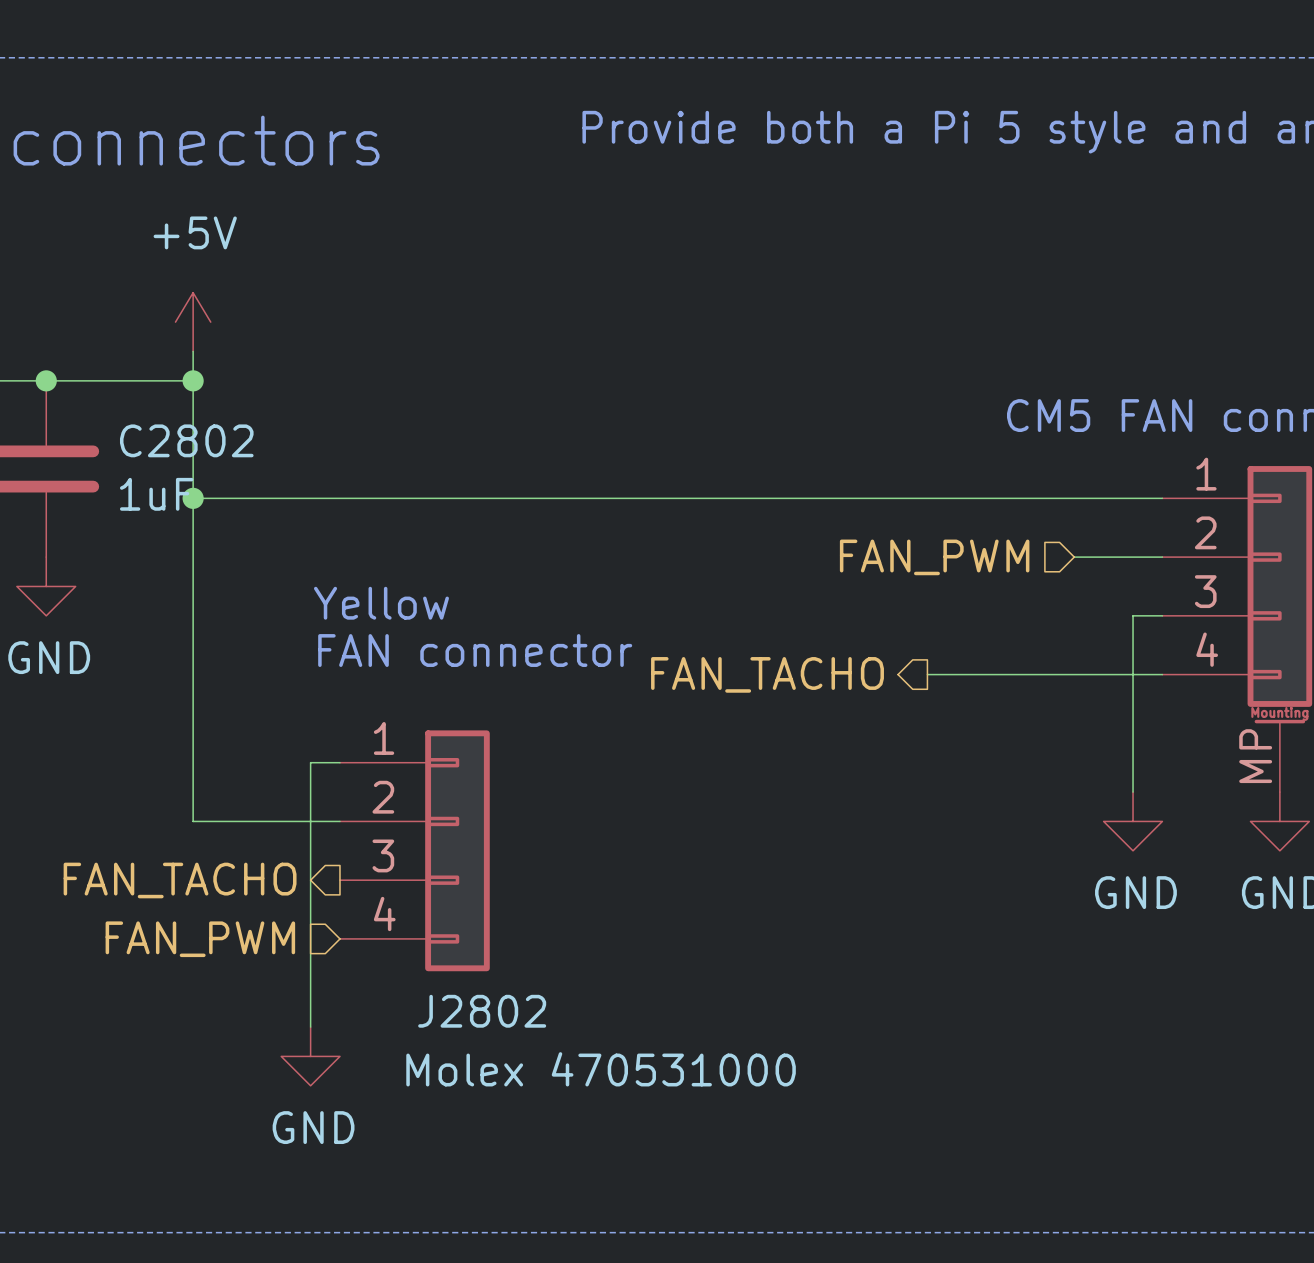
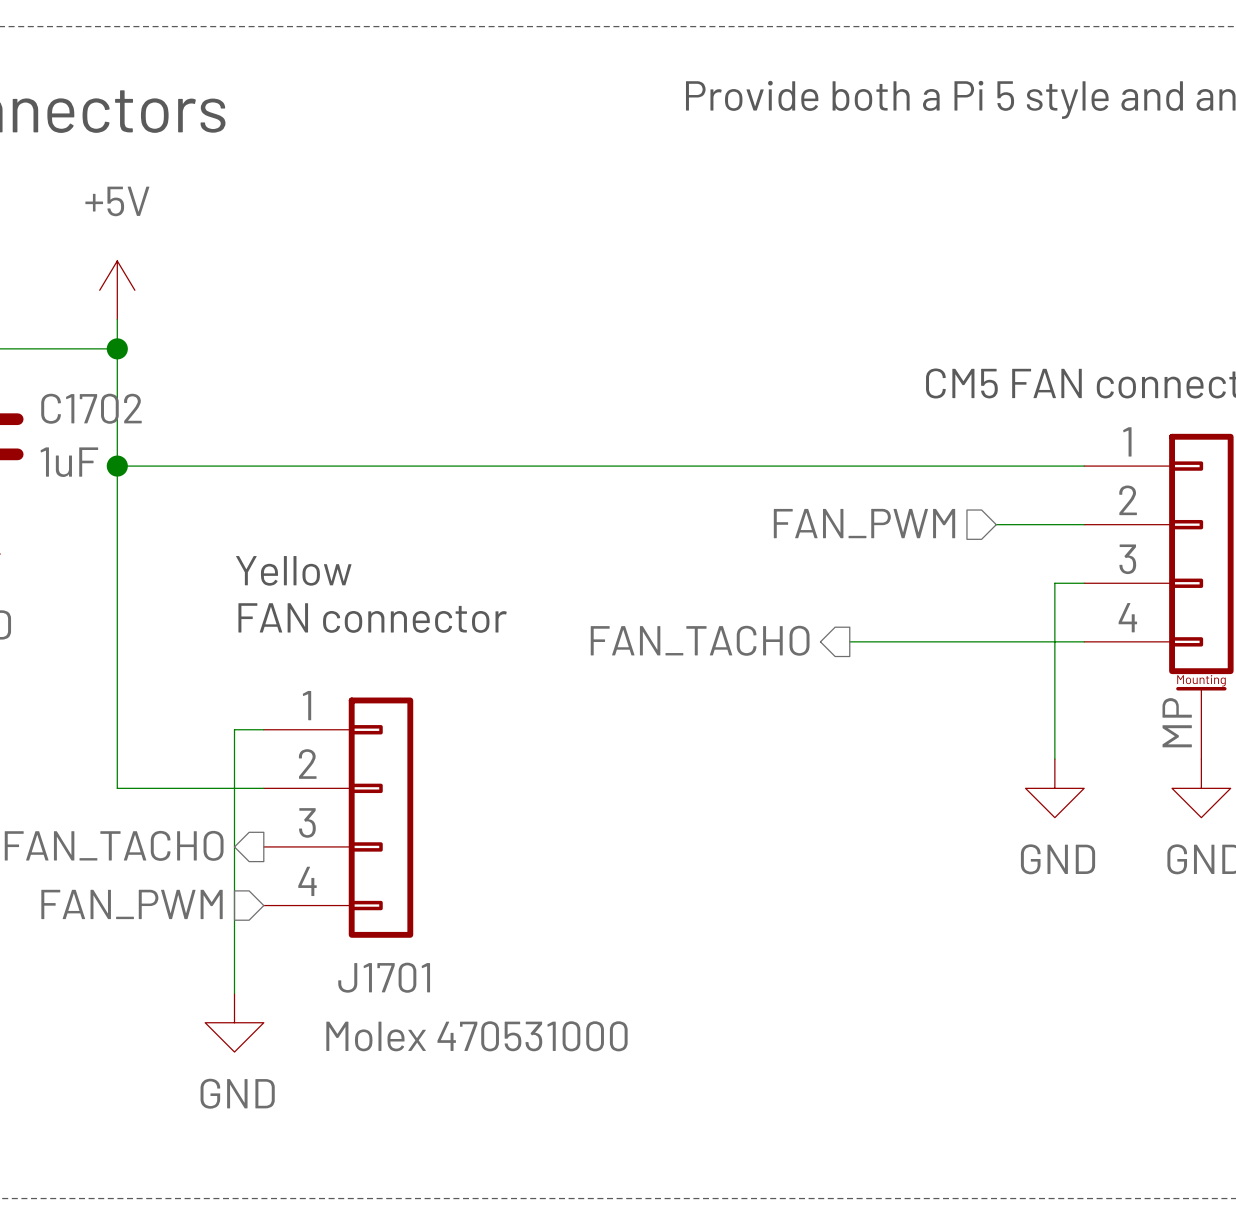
C2802 name: C2802 (186, 440) -> C1702 (91, 408)
J2802 name: J2802 (482, 1011) -> J1701 (384, 977)

